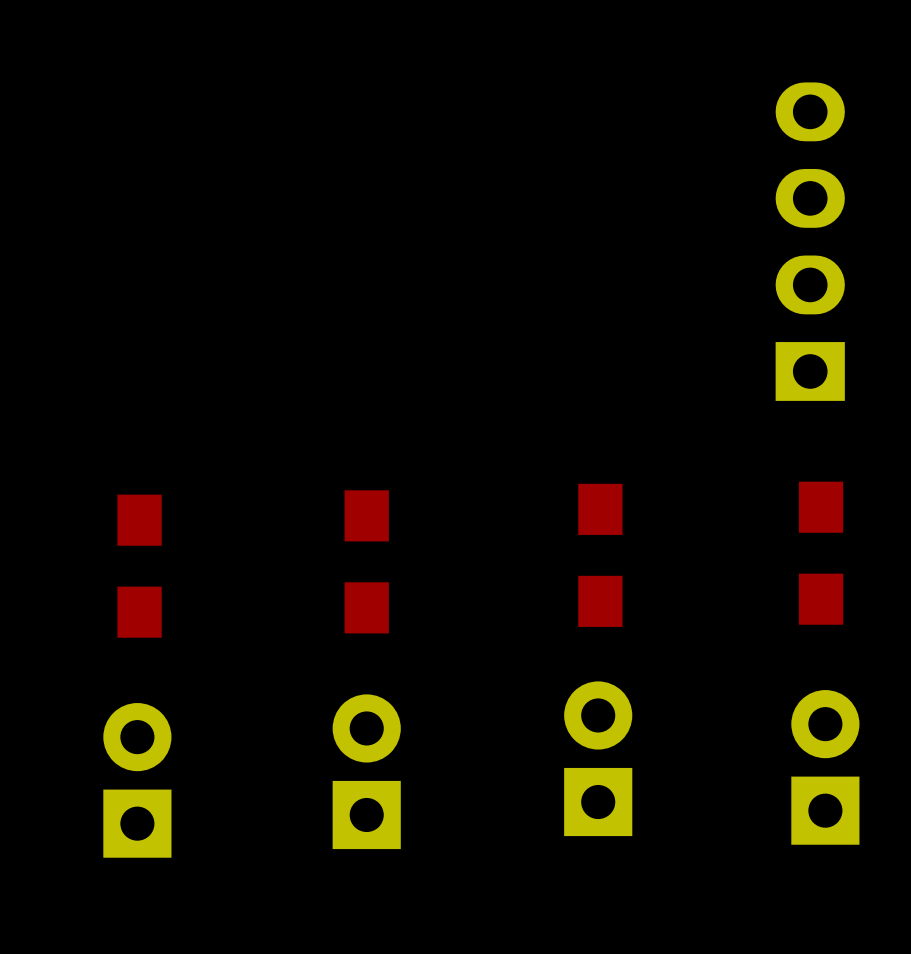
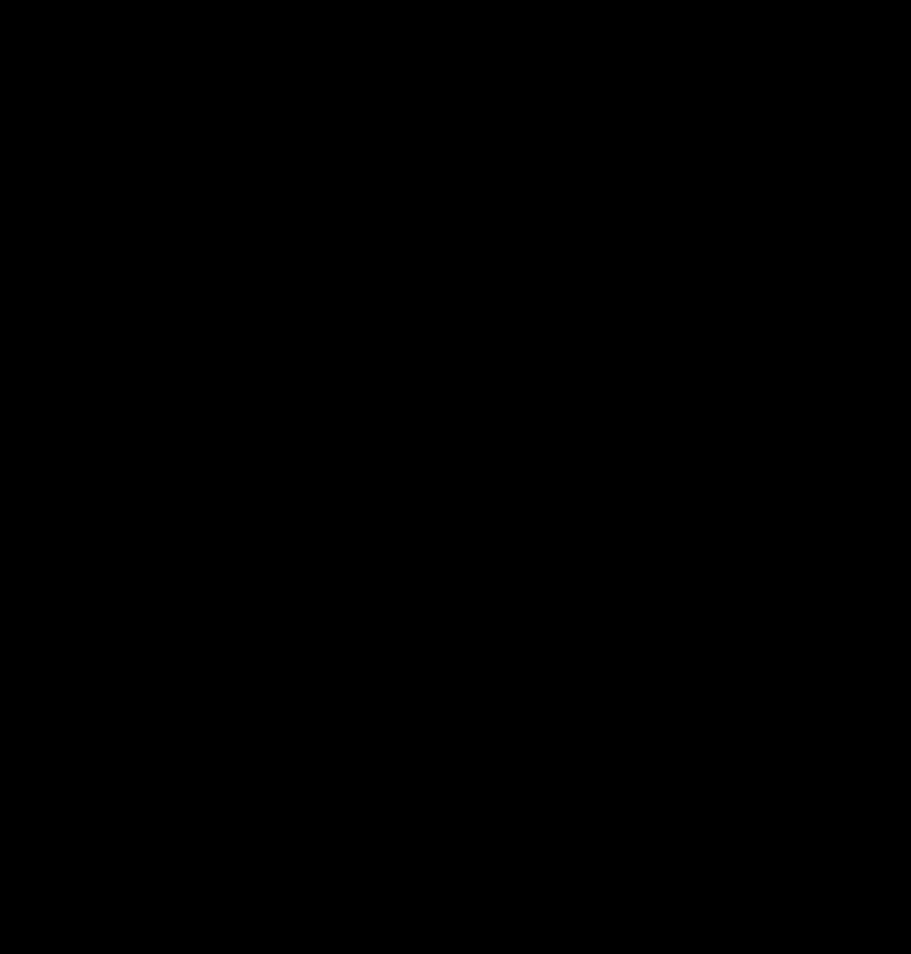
part: (810, 241) -> none
part: (821, 553) -> none
part: (600, 555) -> none
part: (366, 561) -> none
part: (139, 566) -> none
part: (598, 758) -> none
part: (825, 767) -> none
part: (366, 771) -> none
part: (137, 780) -> none

